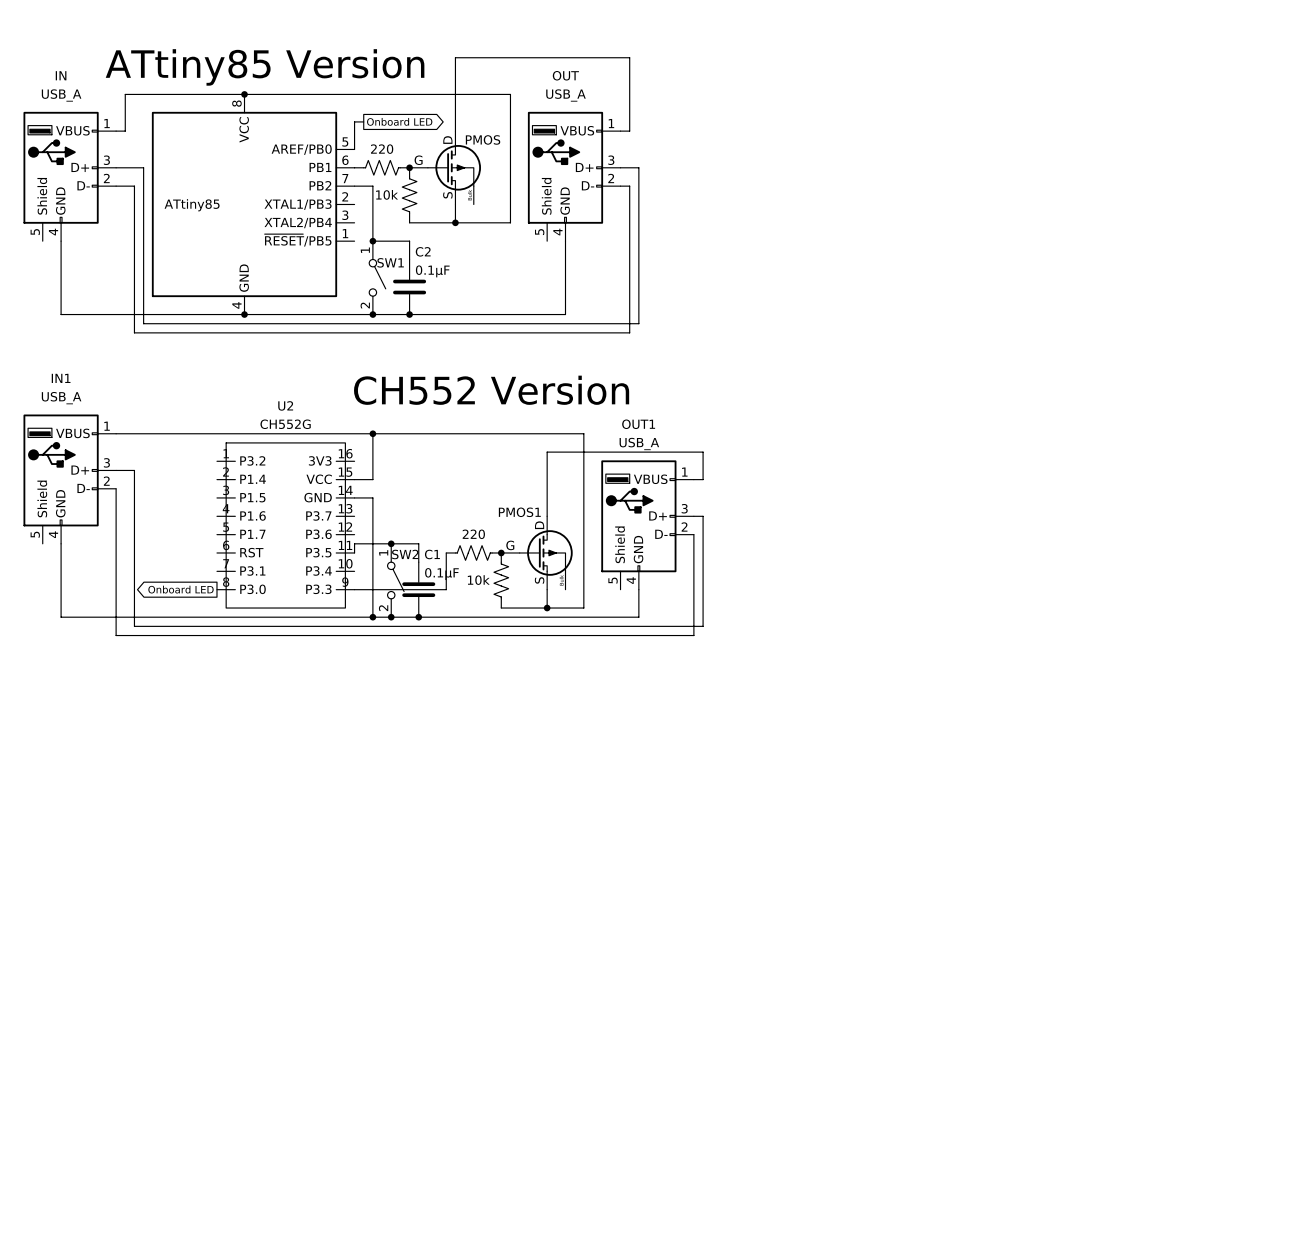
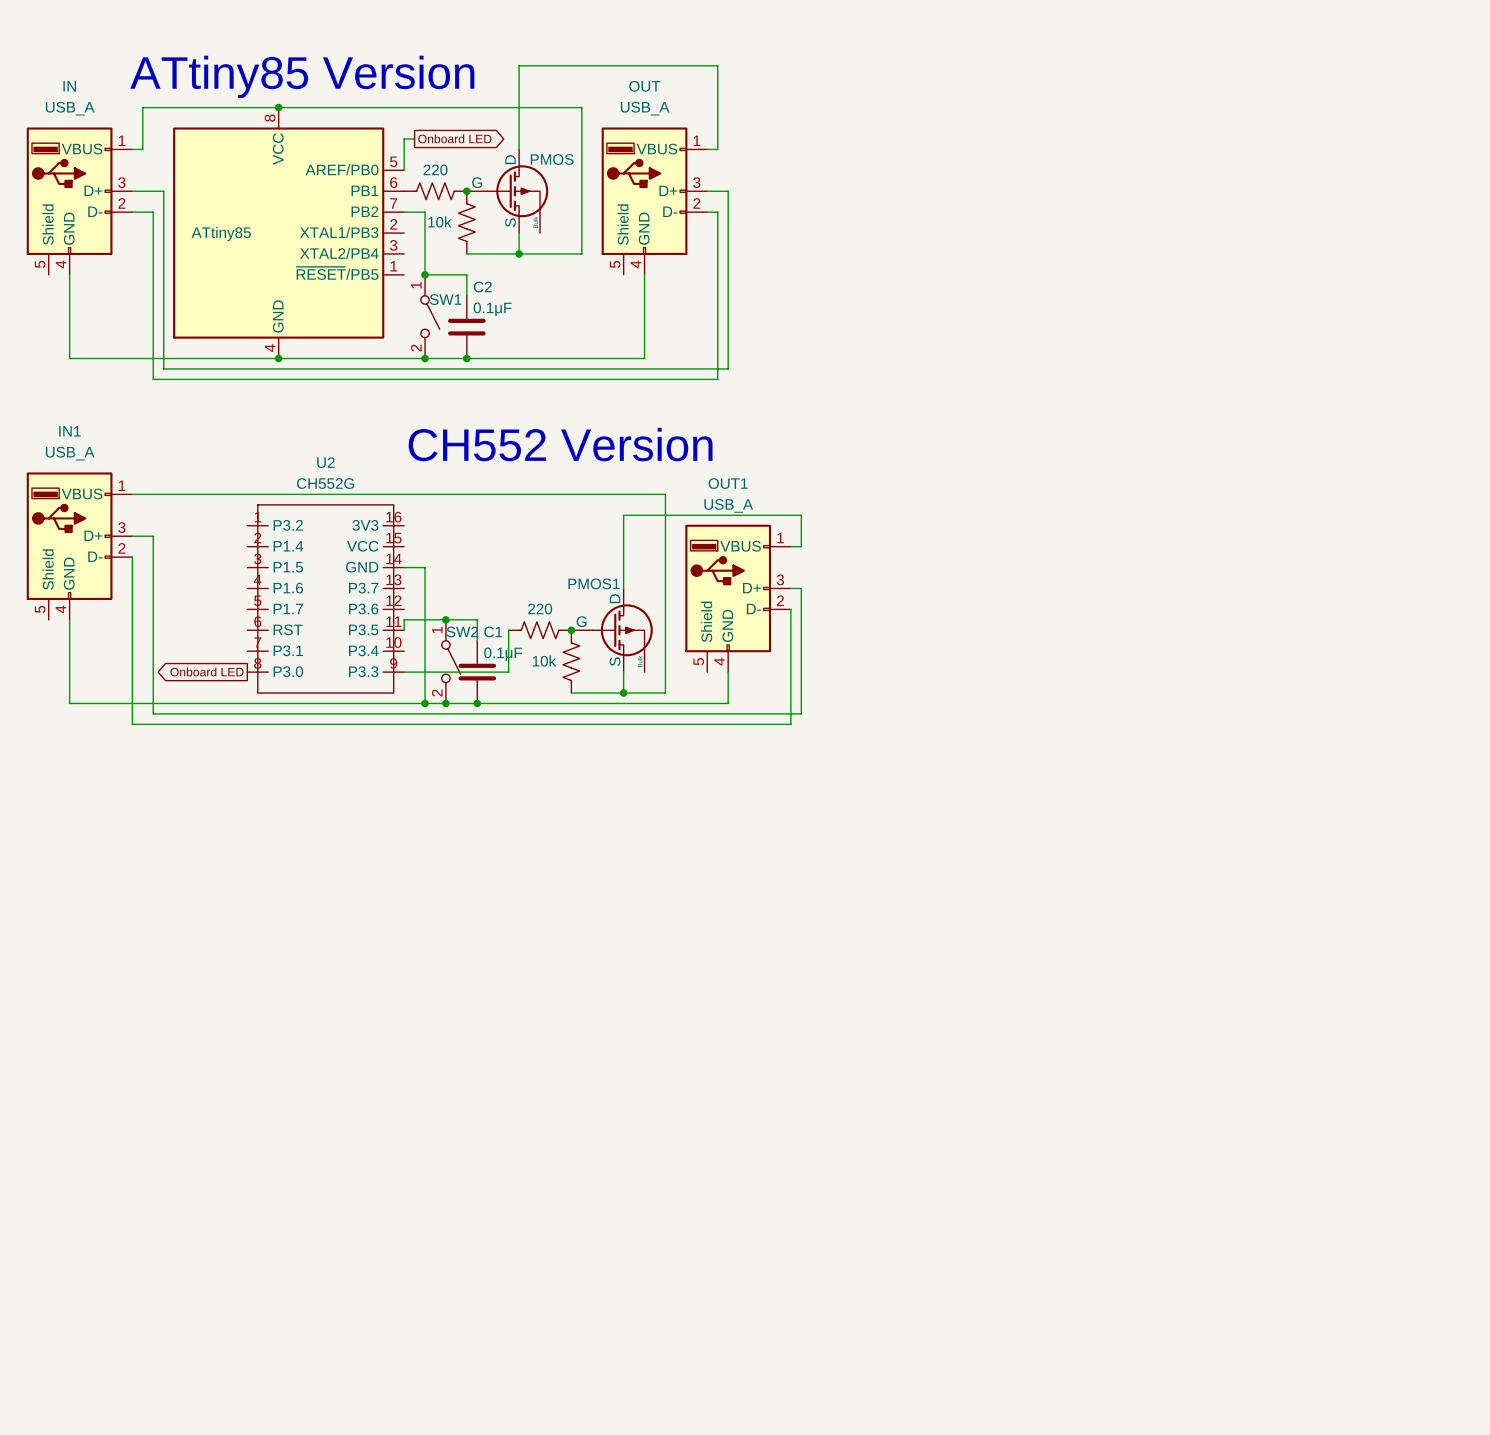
wire: (372, 433) (372, 479) (354, 479) -> none
junction: (372, 433) -> none

